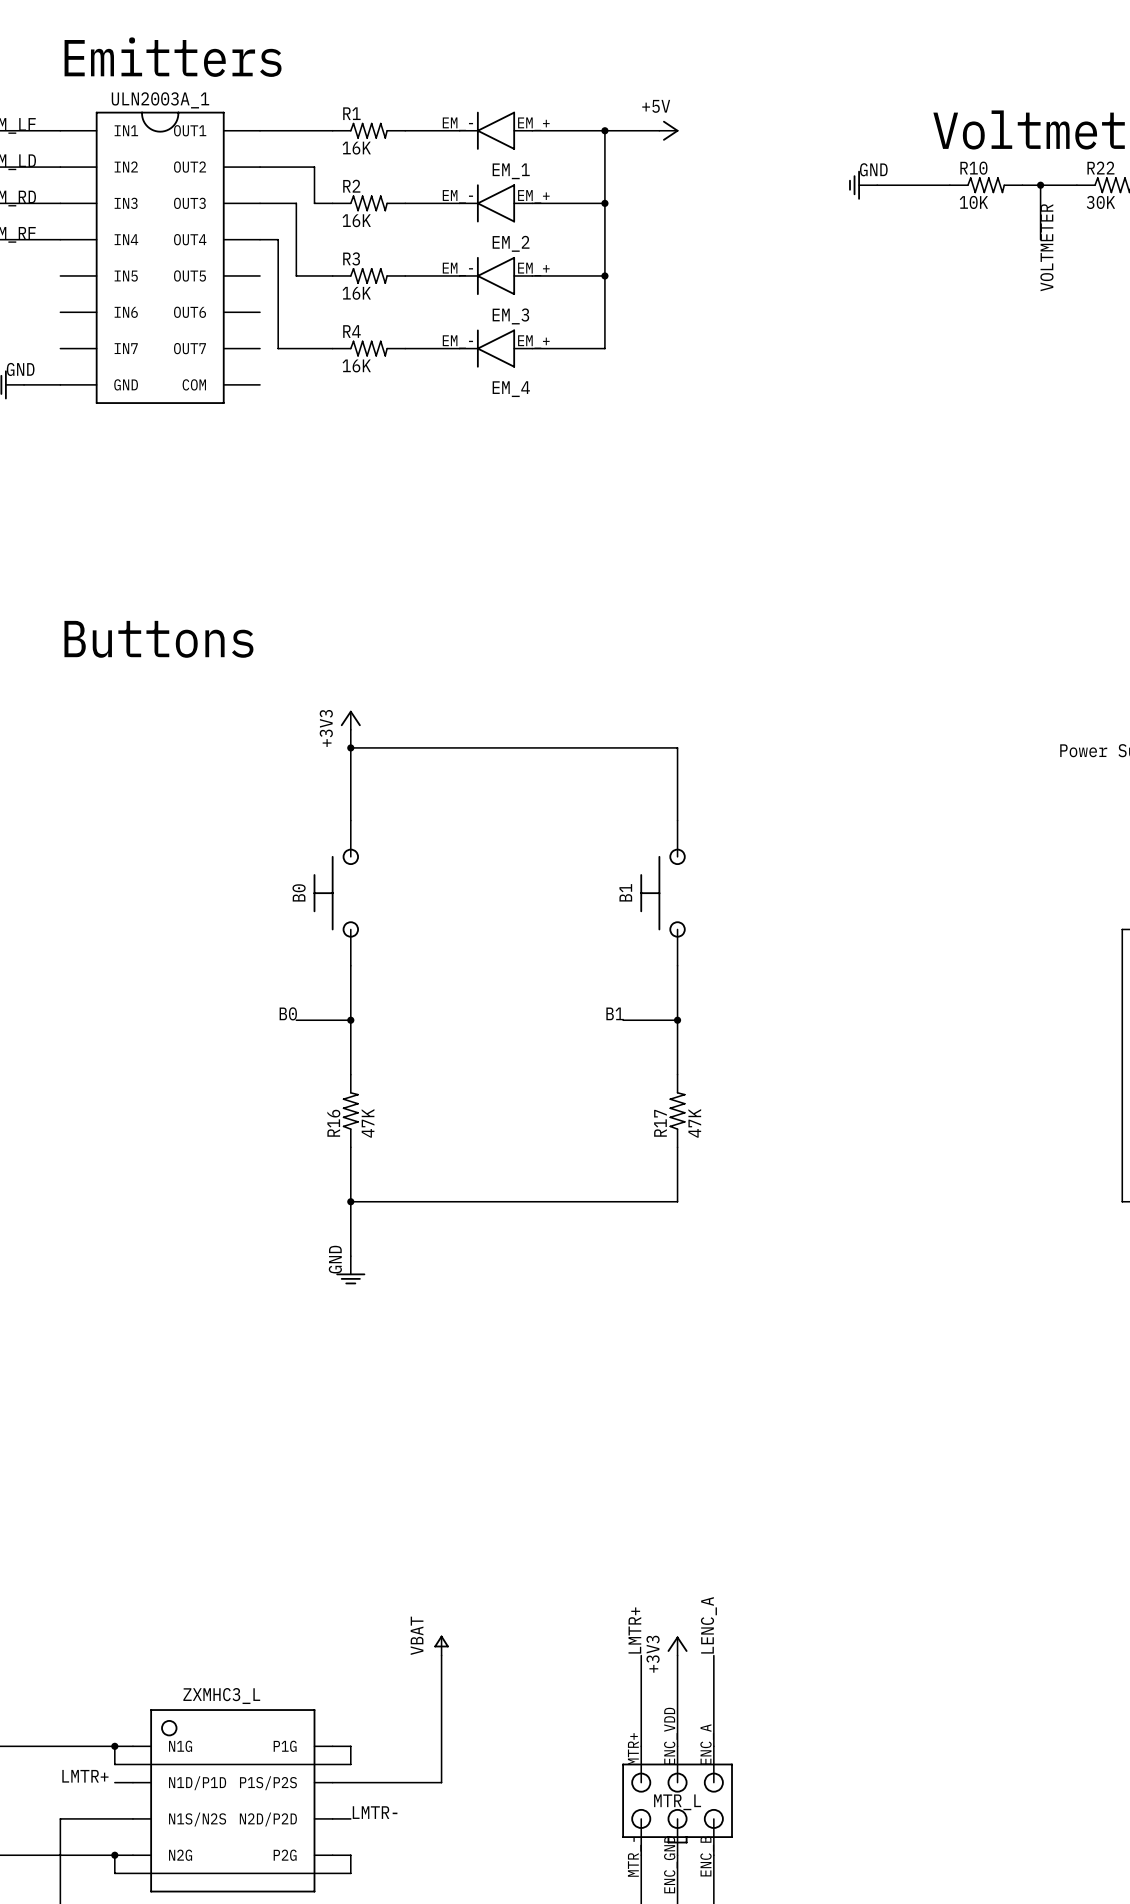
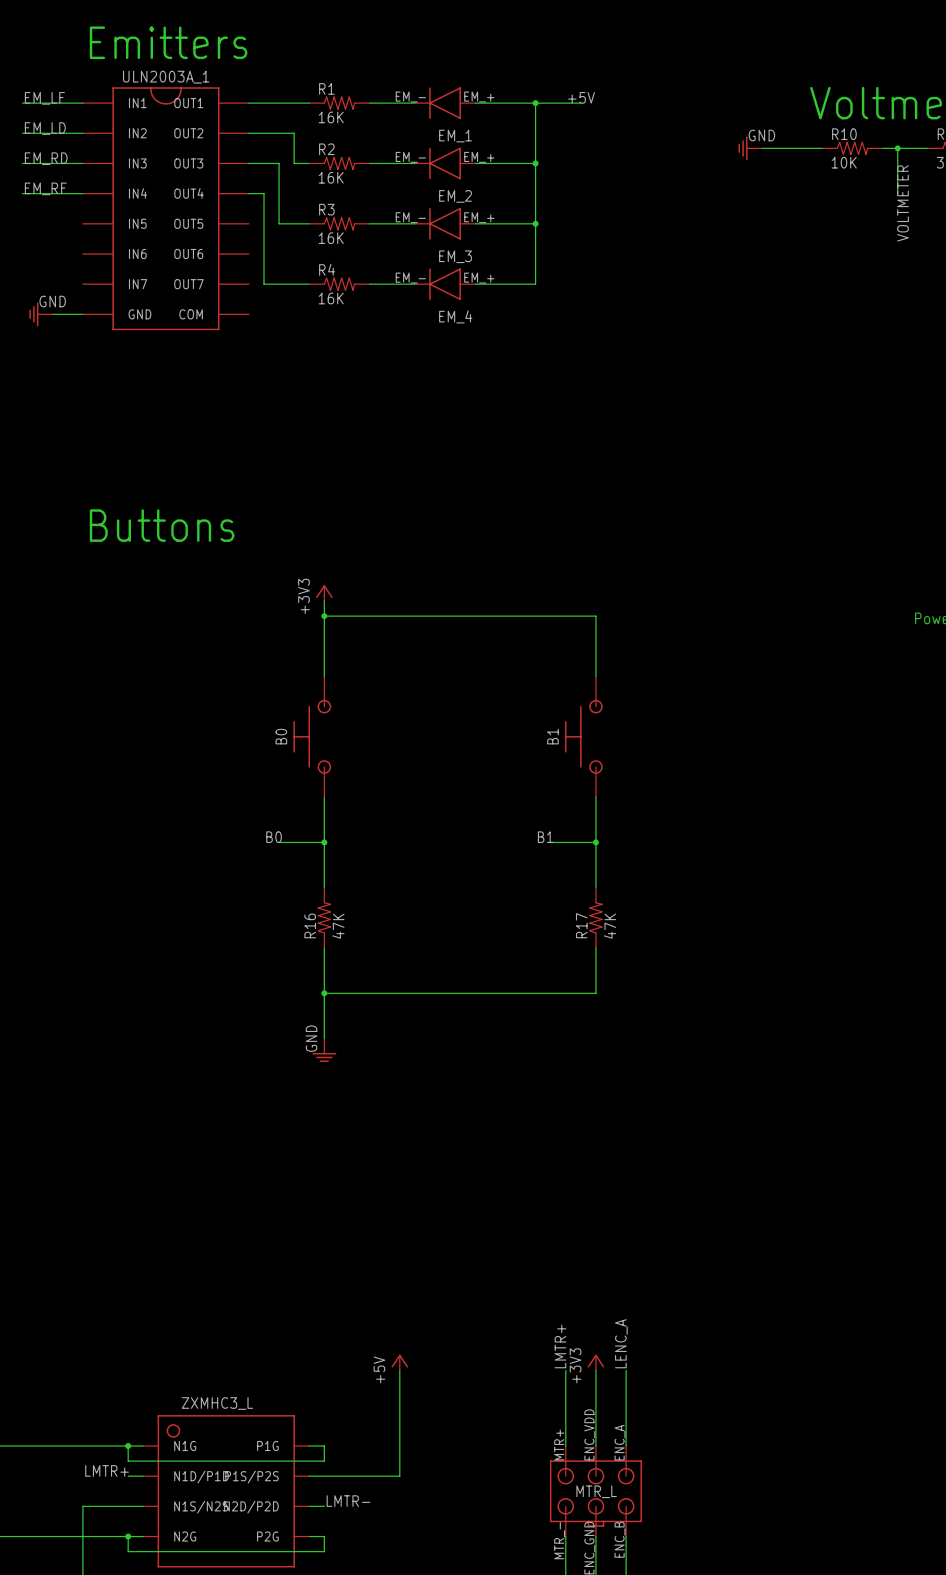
label: none -> +5V (581, 97)
power symbol: +5V (668, 130) -> none
power symbol: VBAT (441, 1645) -> +5V (399, 1362)

